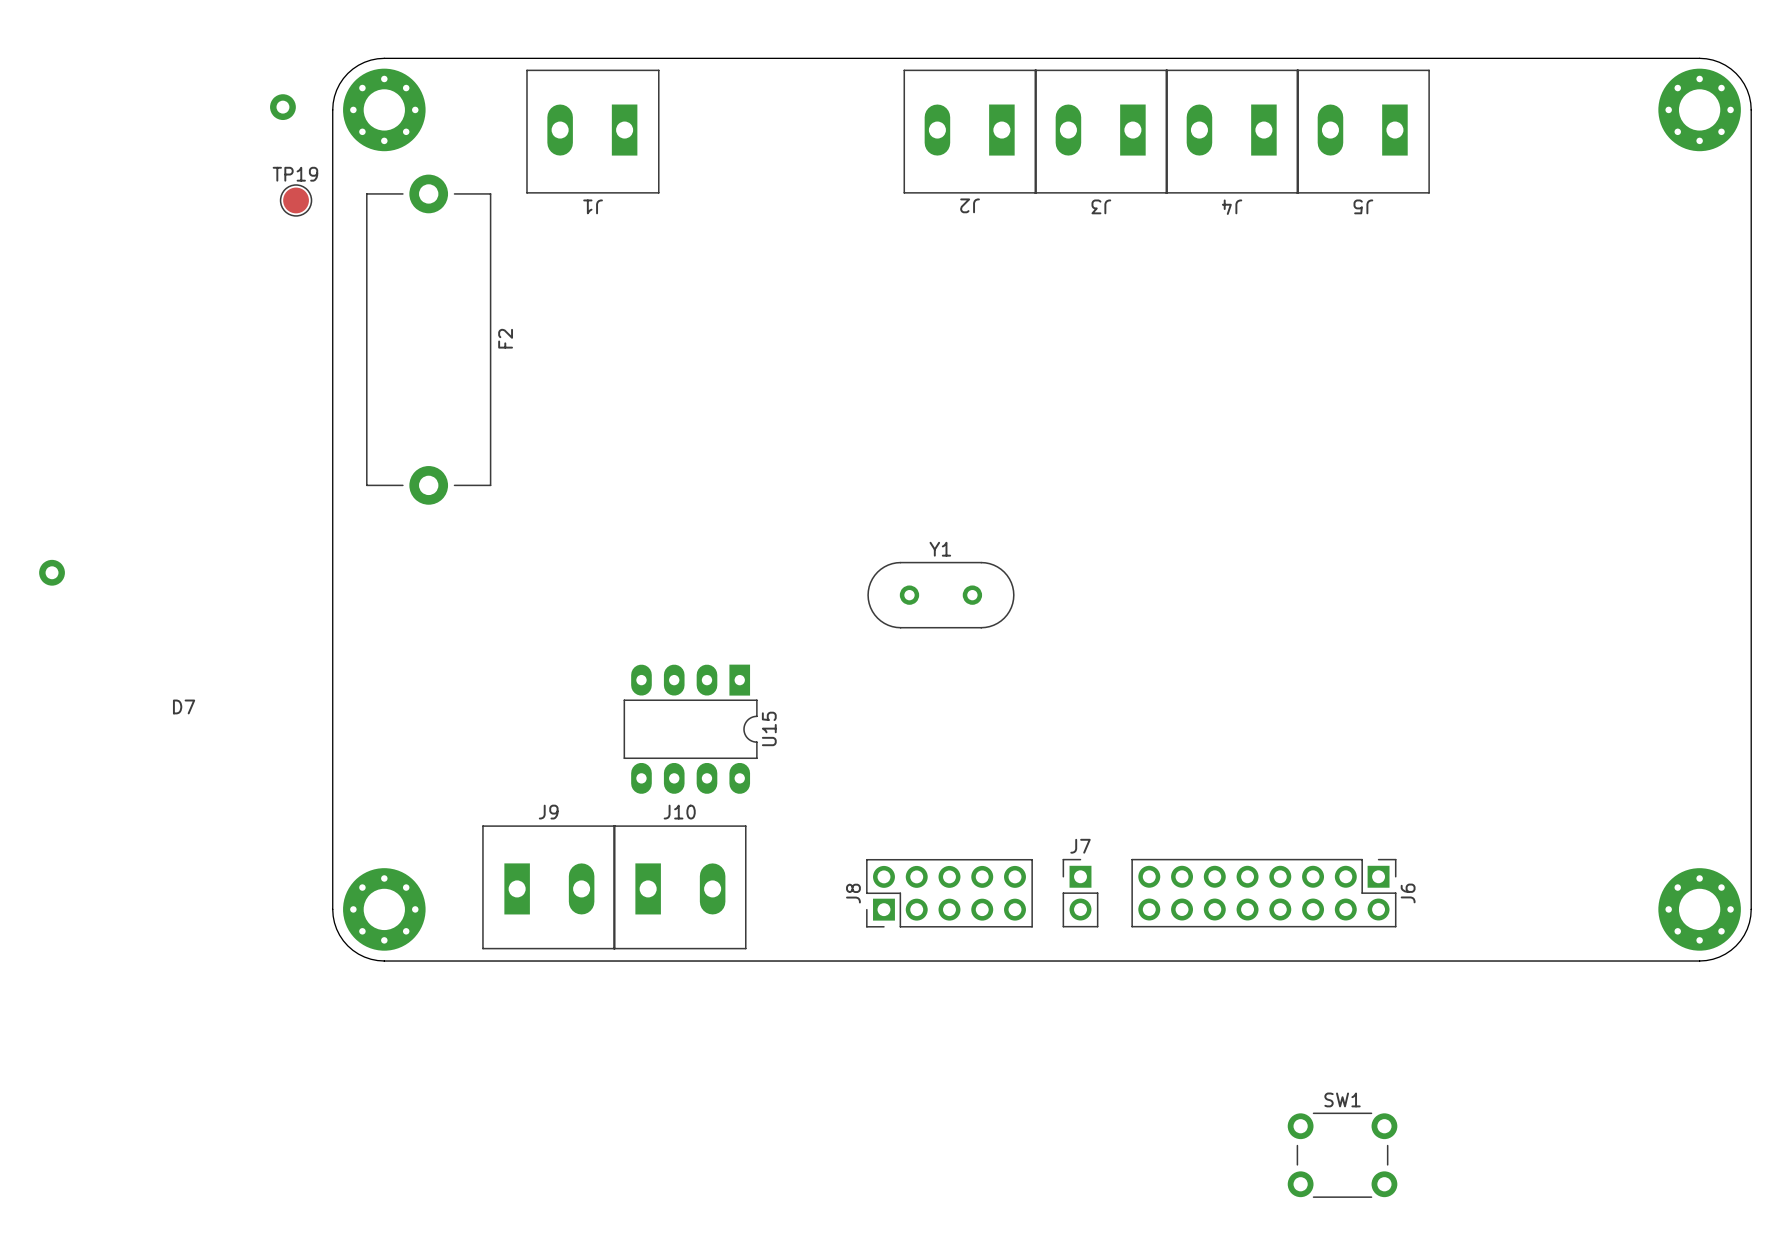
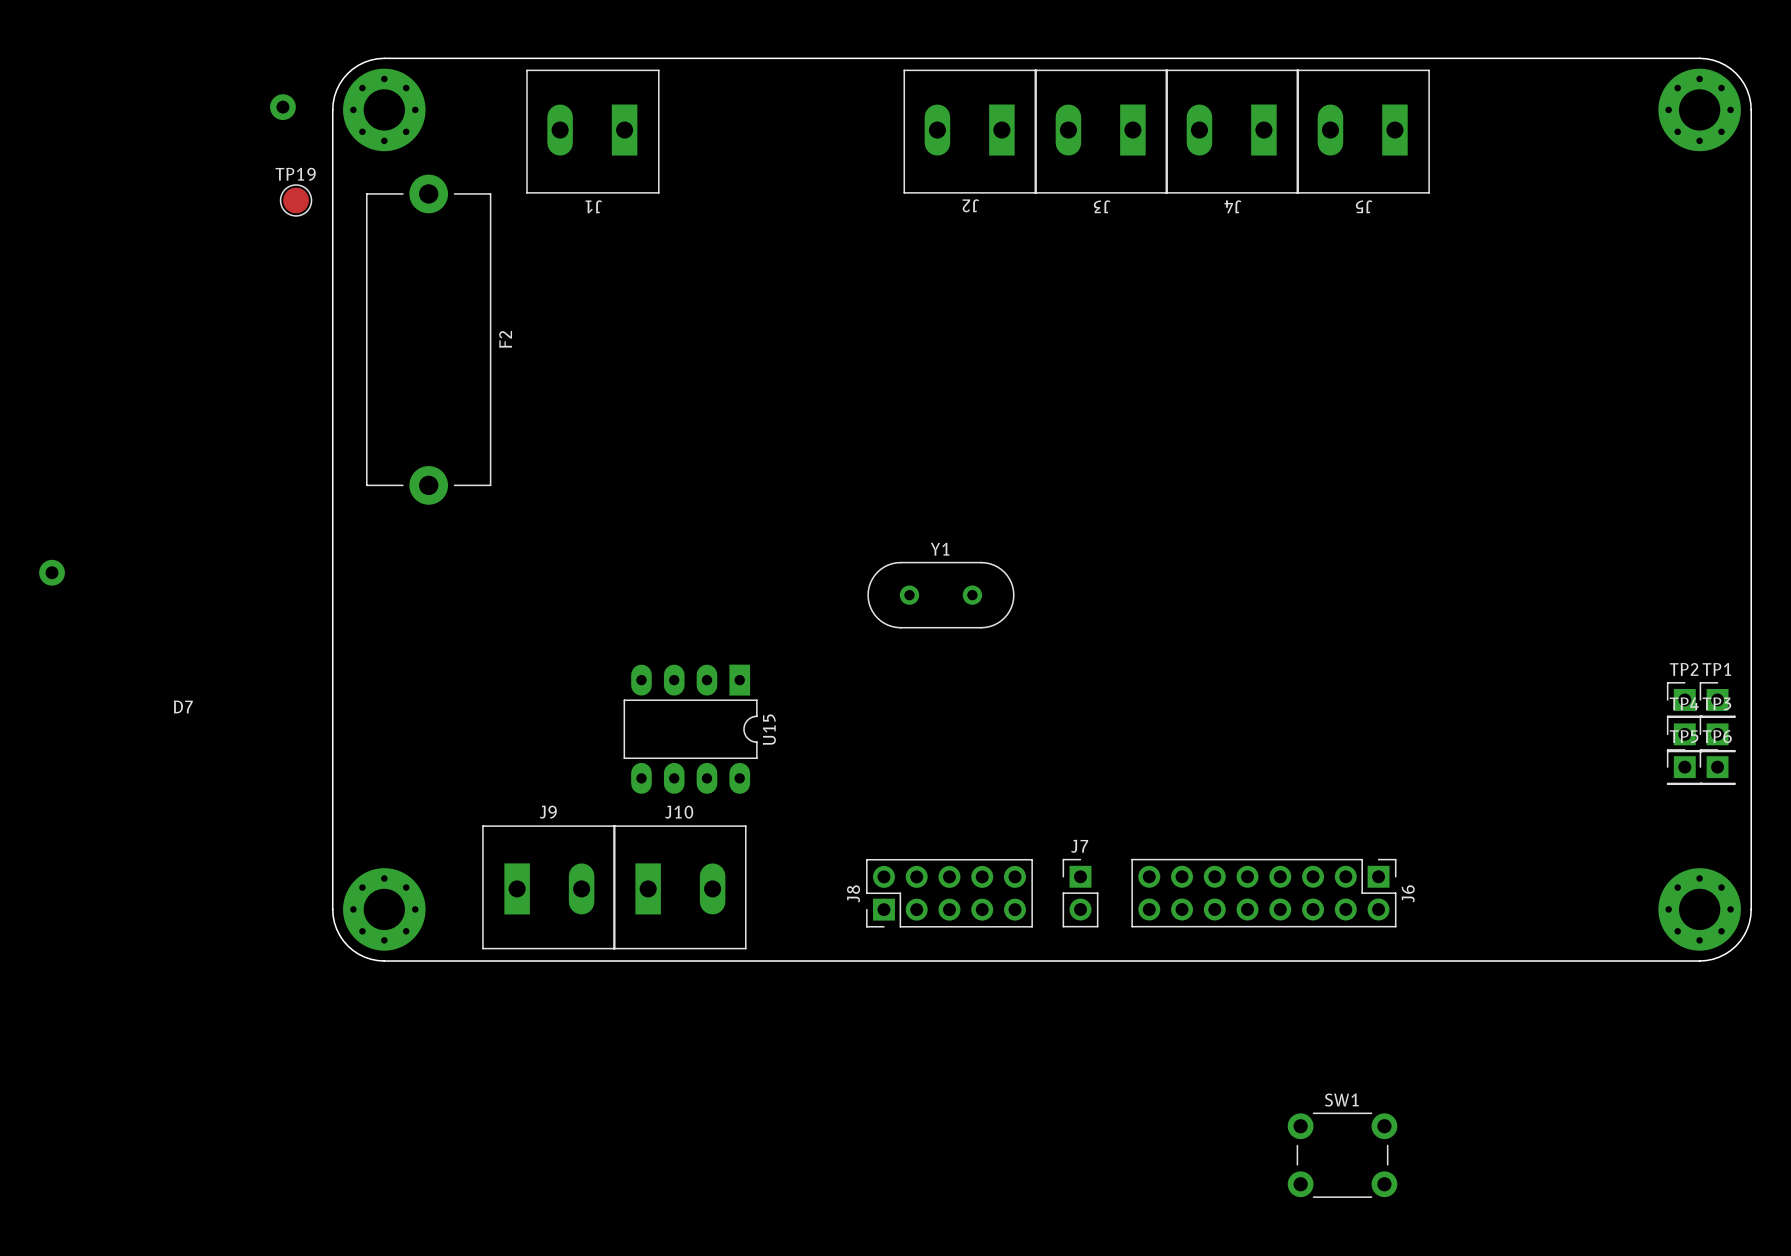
TP2: none -> (1684, 699)
TP1: none -> (1717, 699)
TP4: none -> (1684, 734)
TP3: none -> (1717, 734)
TP5: none -> (1684, 767)
TP6: none -> (1717, 767)

